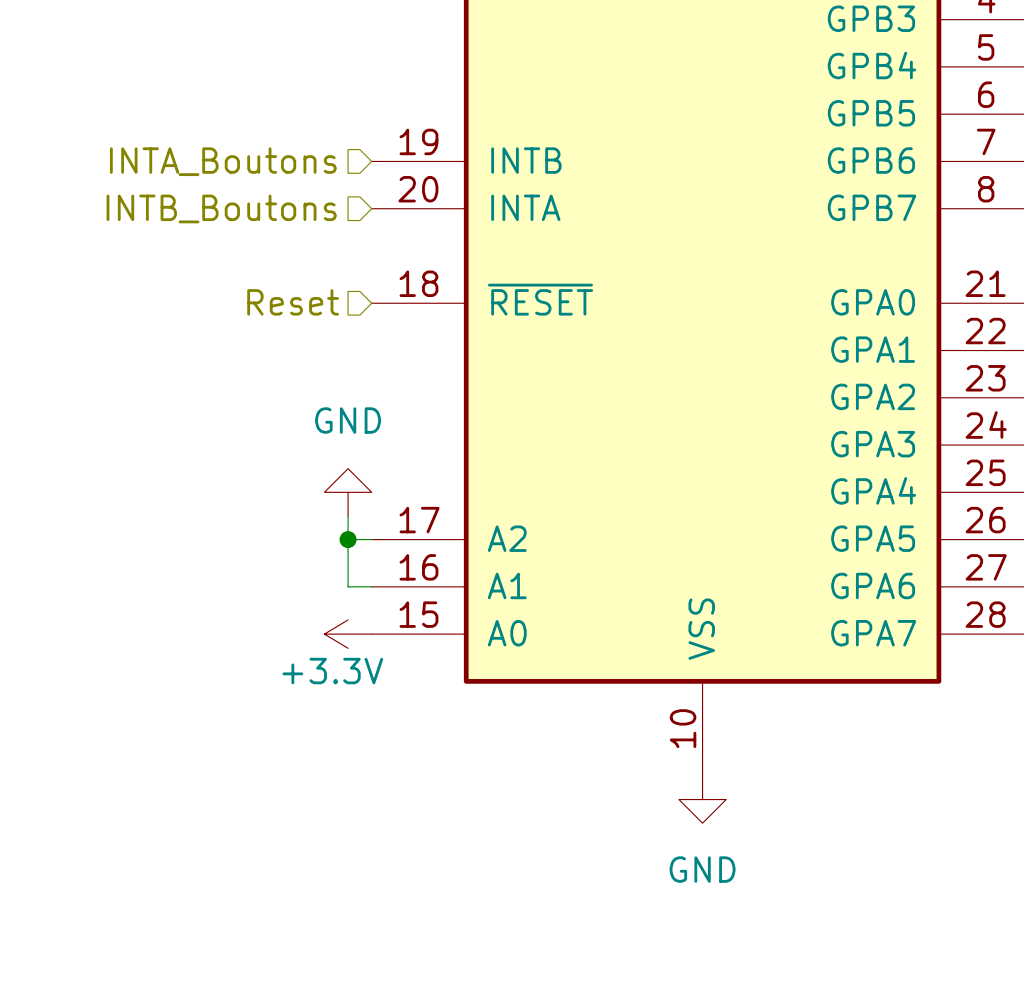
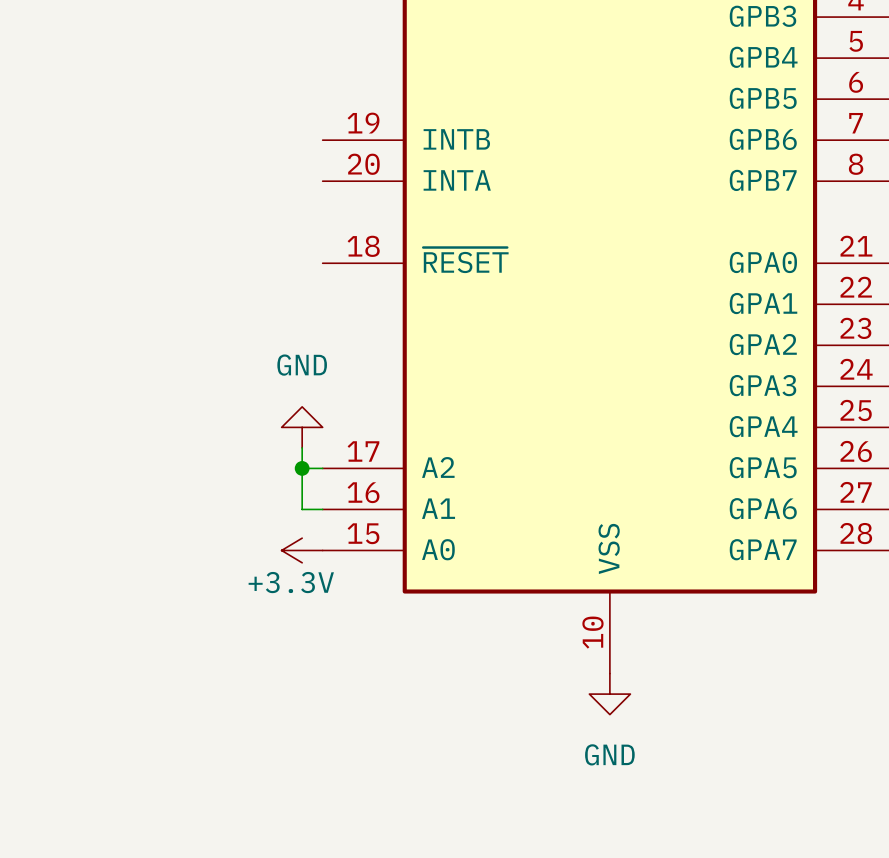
hierarchical label: INTA_Boutons (223, 161) -> none
hierarchical label: INTB_Boutons (221, 208) -> none
hierarchical label: Reset (293, 302) -> none

